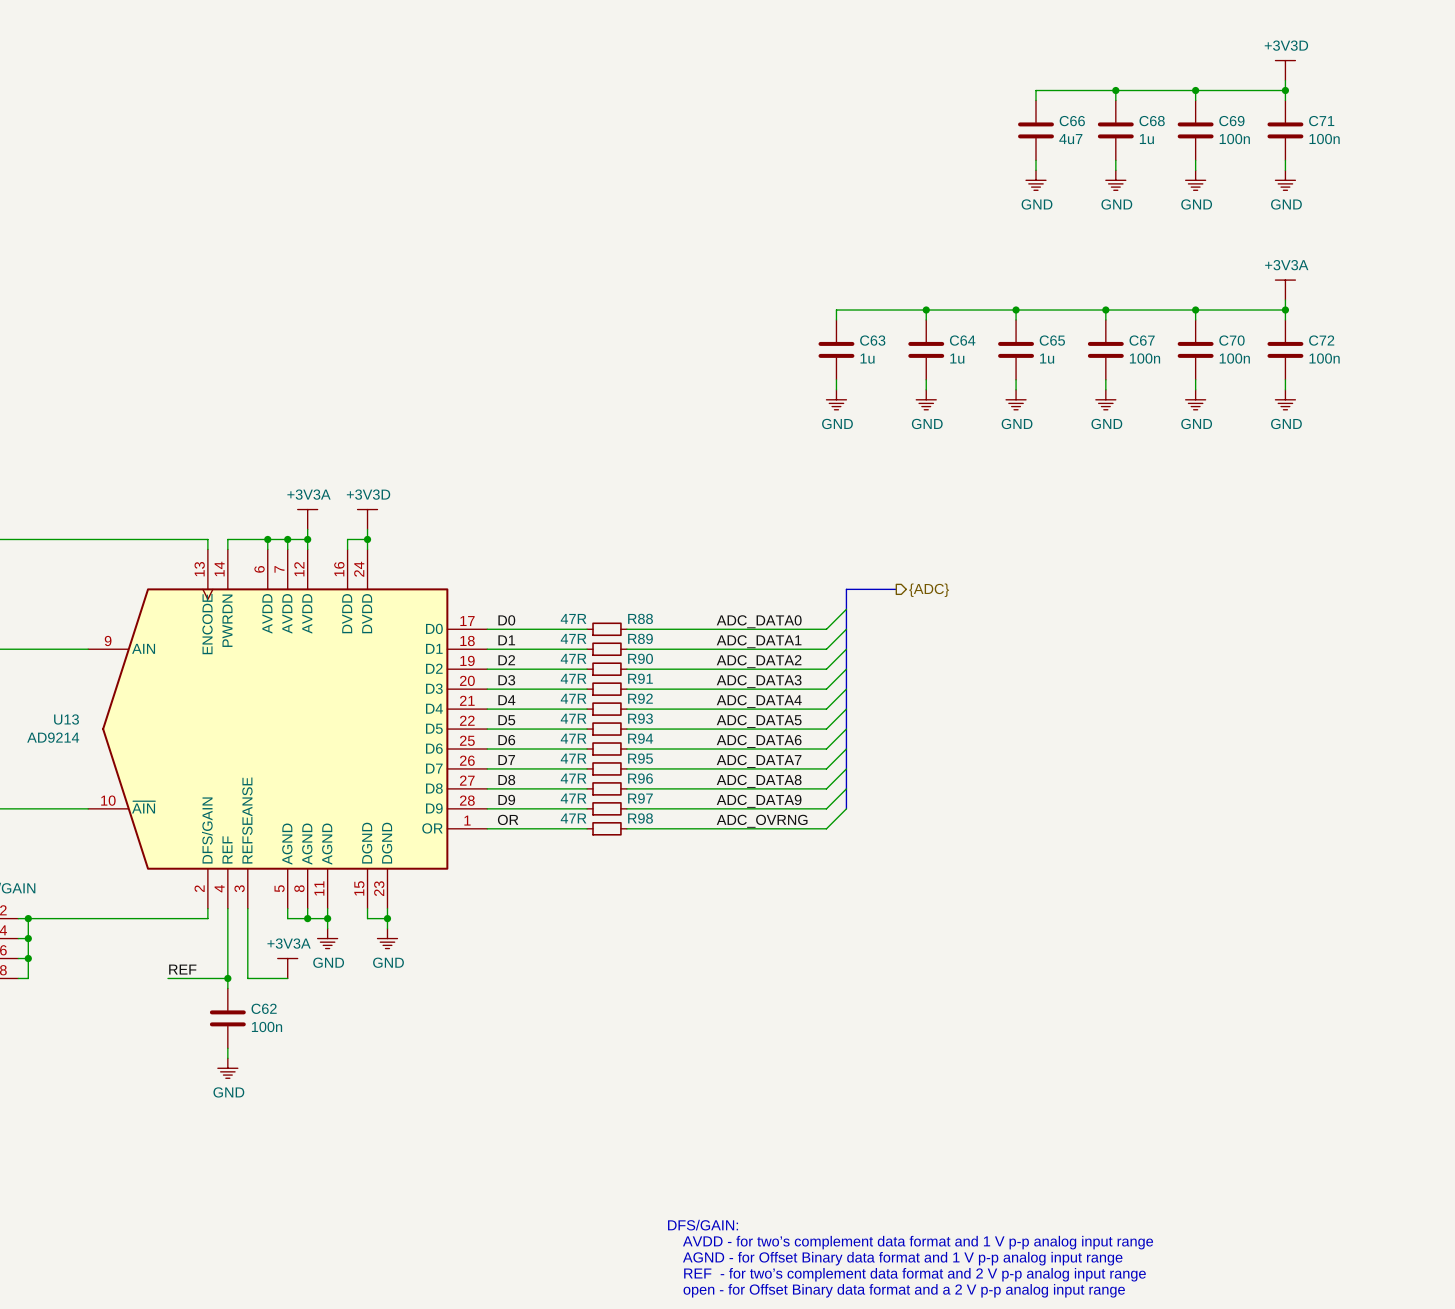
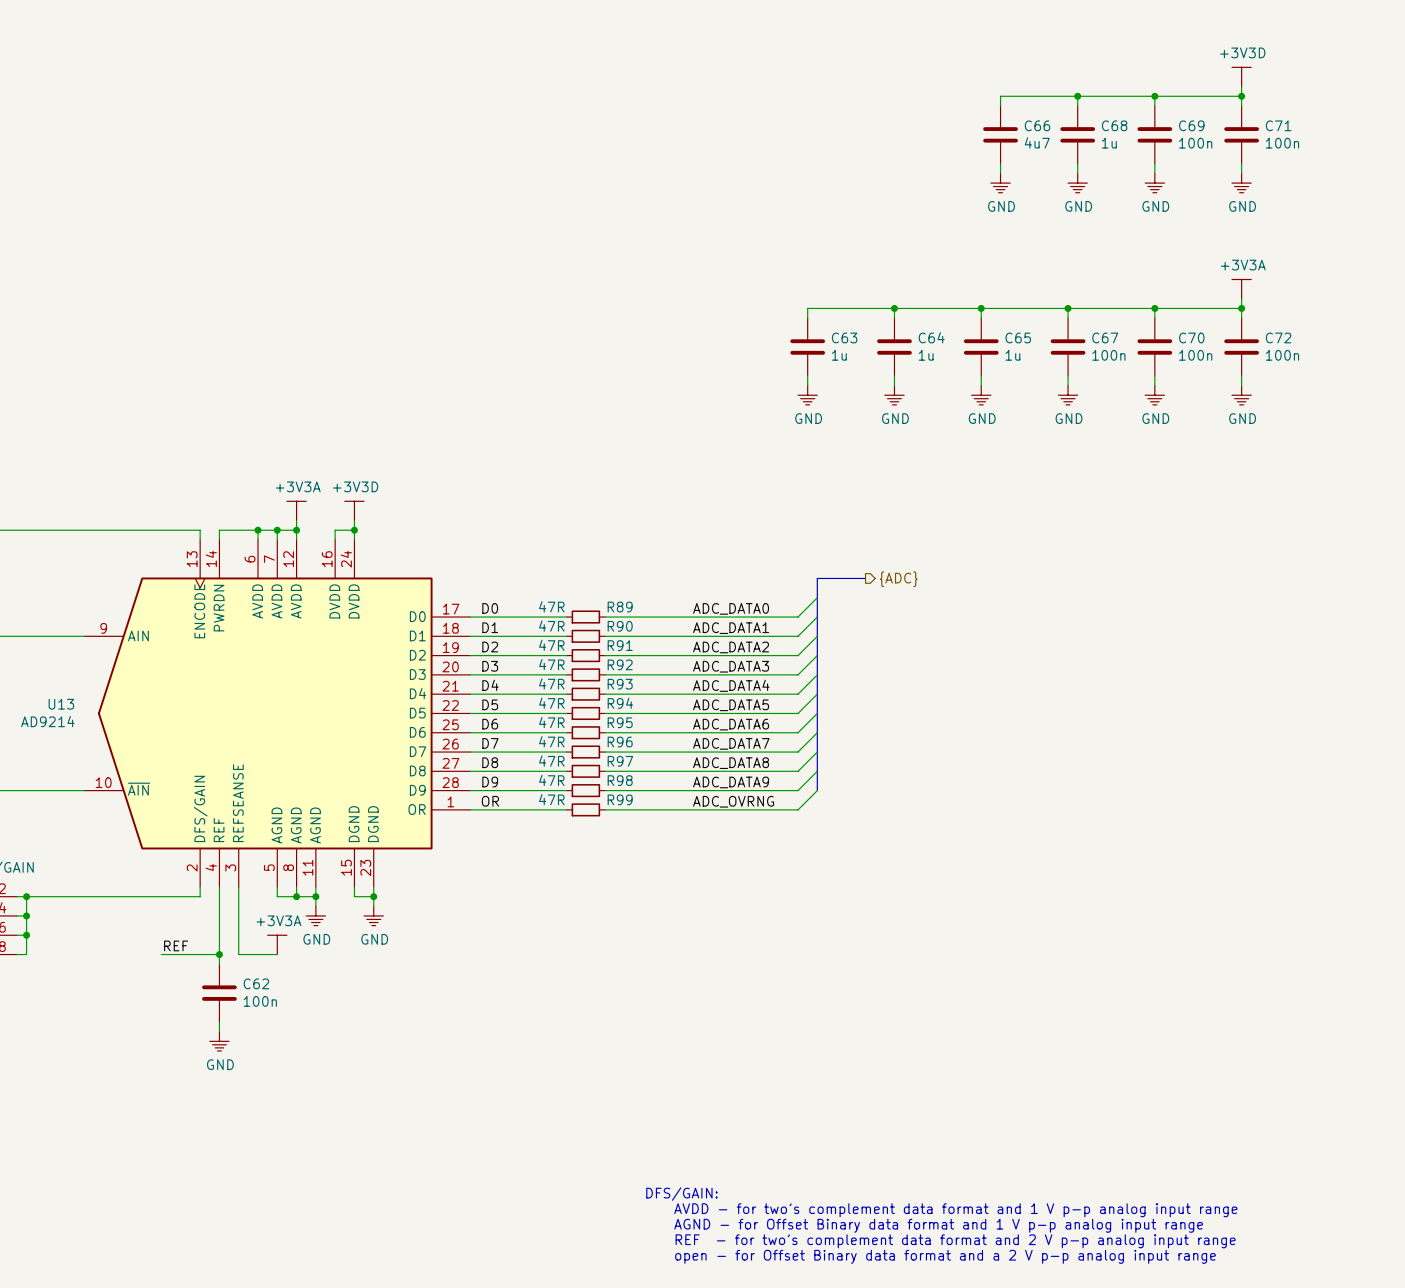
R88 name: R88 (640, 618) -> R89 (620, 607)
R89 name: R89 (640, 638) -> R90 (620, 626)
R90 name: R90 (640, 658) -> R91 (620, 645)
R91 name: R91 (640, 678) -> R92 (620, 664)
R92 name: R92 (640, 698) -> R93 (620, 684)
R93 name: R93 (640, 718) -> R94 (620, 703)
R94 name: R94 (640, 738) -> R95 (620, 722)
R95 name: R95 (640, 758) -> R96 (620, 742)
R96 name: R96 (640, 778) -> R97 (620, 761)
R97 name: R97 (640, 798) -> R98 (620, 780)
R98 name: R98 (640, 818) -> R99 (620, 799)

